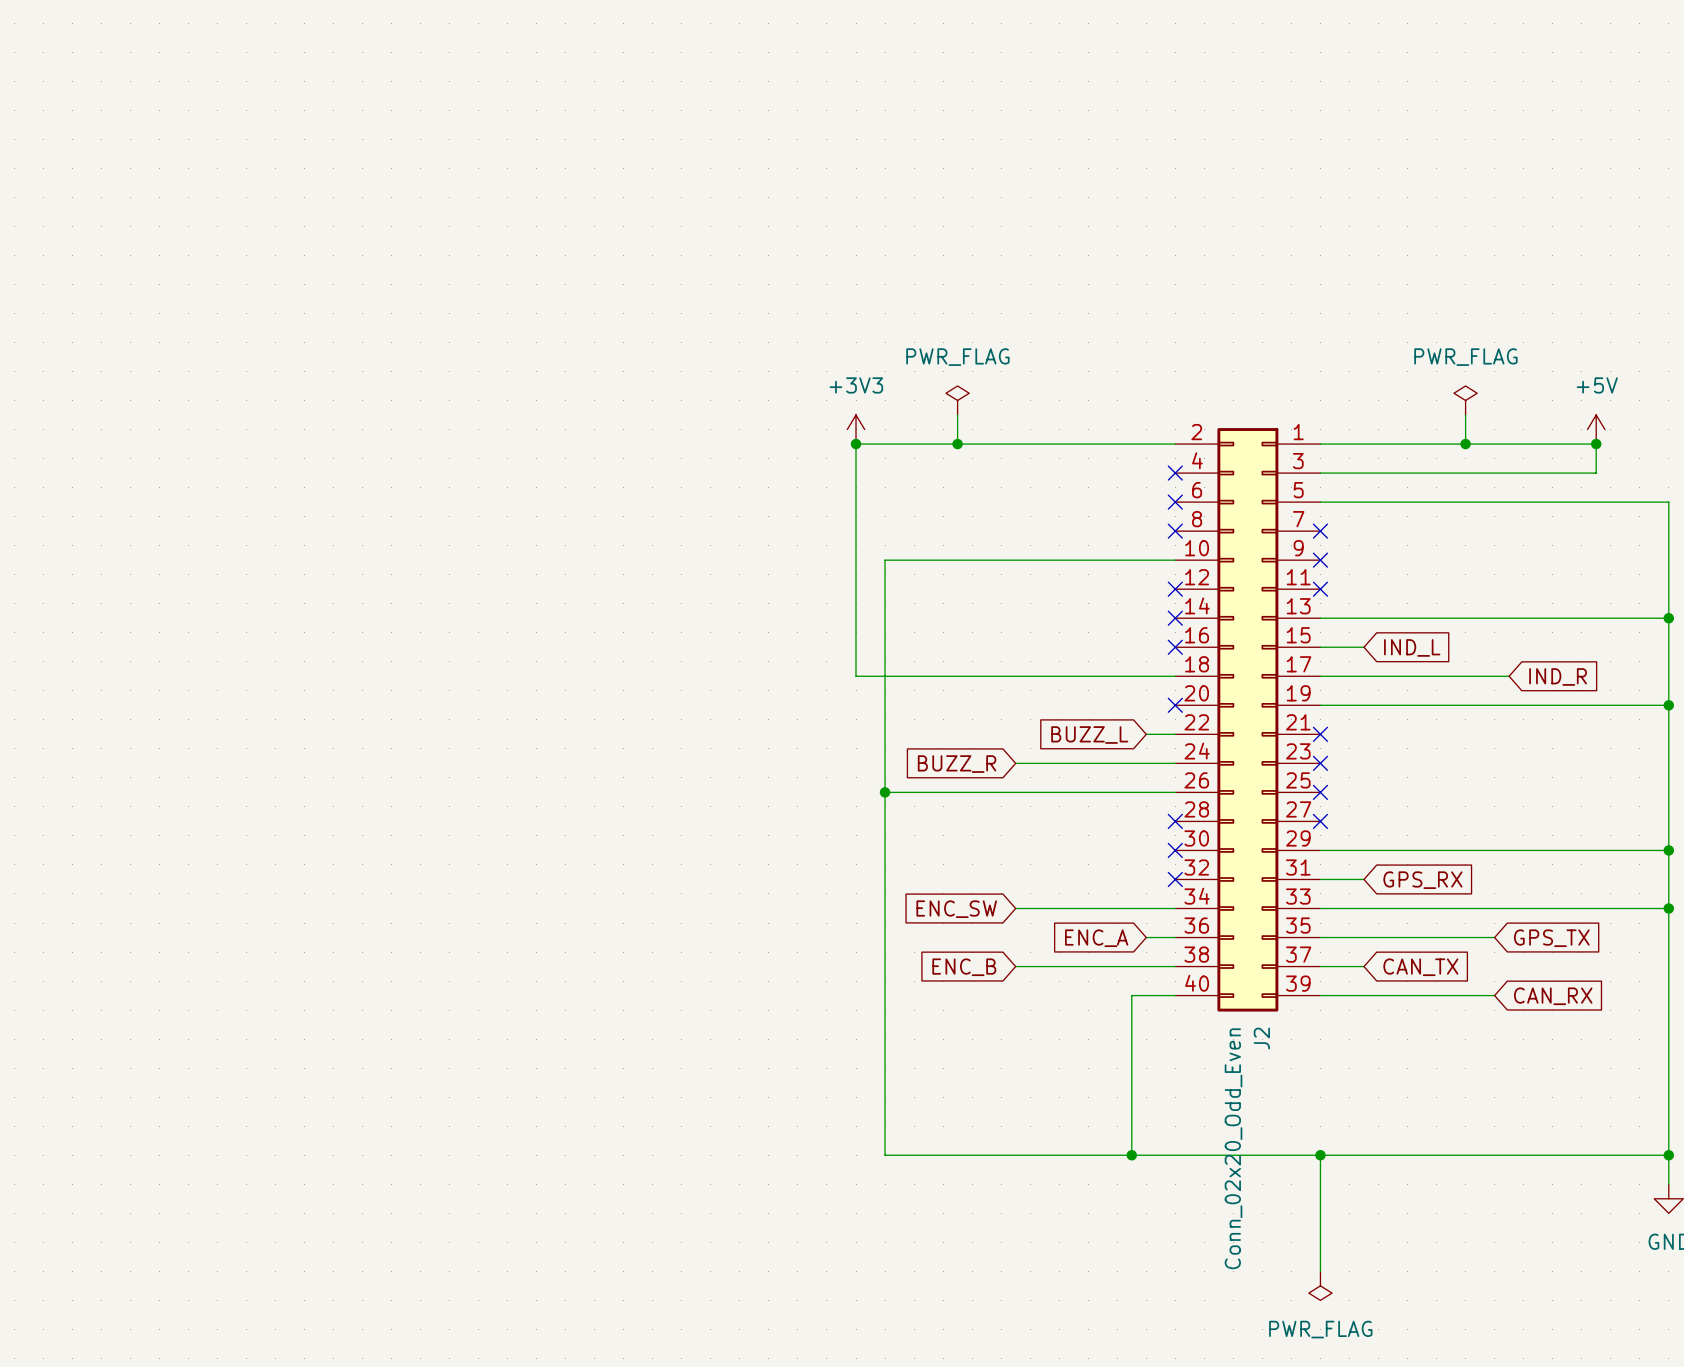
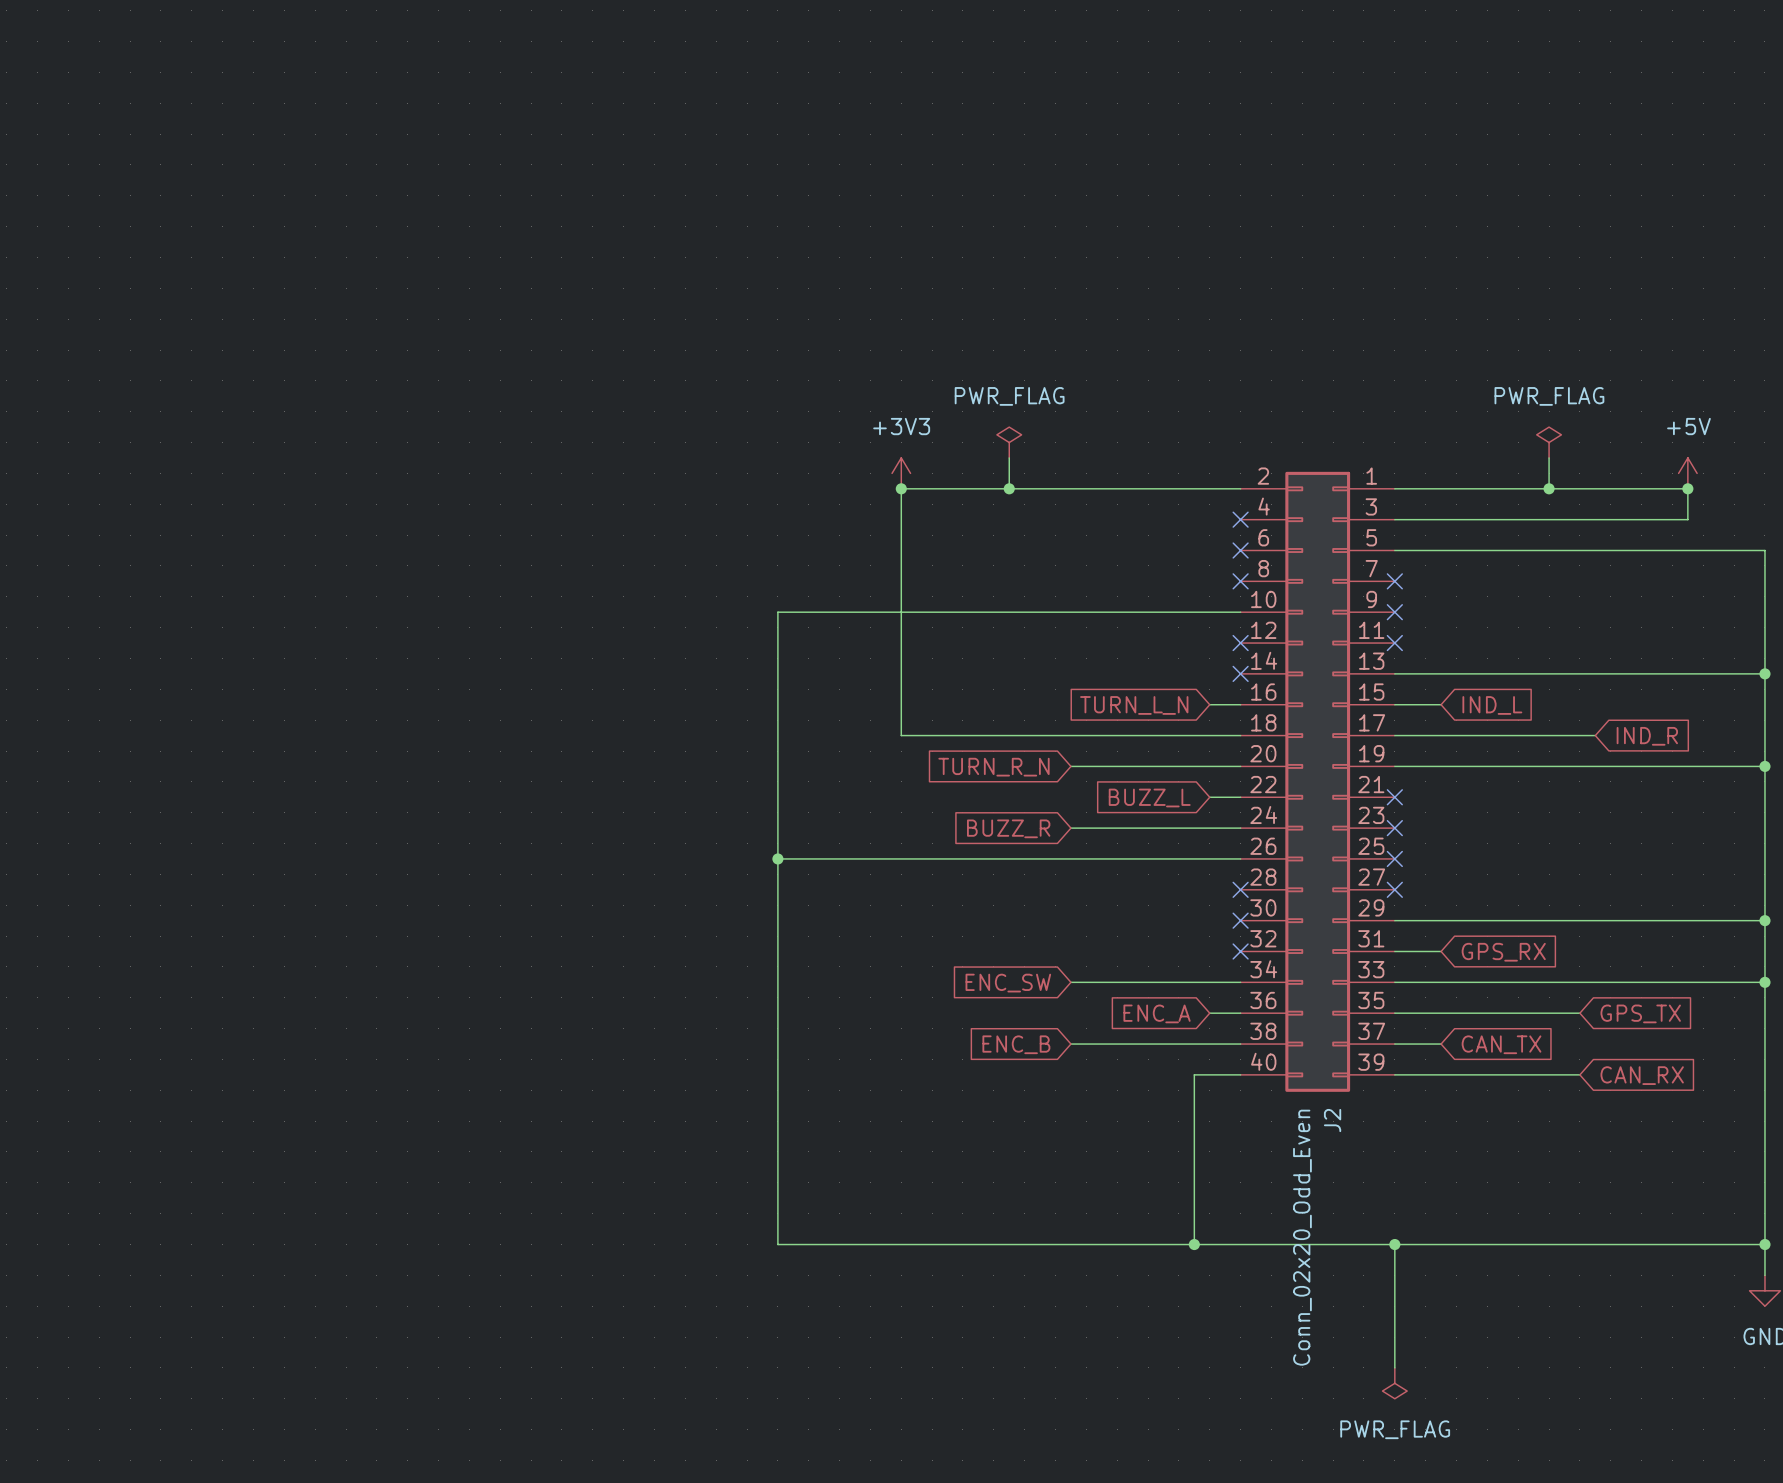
wire: (885, 560) (885, 1155) -> (932, 612) (777, 612) (777, 1244) (932, 1244)
global label: none -> TURN_L_N (1134, 705)
wire: none -> (1209, 704) (1240, 704)
no-connect mark: (1175, 647) -> none
global label: none -> TURN_R_N (993, 767)
wire: none -> (1070, 766) (1240, 766)
no-connect mark: (1175, 705) -> none
wire: none -> (777, 858) (932, 858)
junction: none -> (777, 858)
junction: (885, 792) -> none

